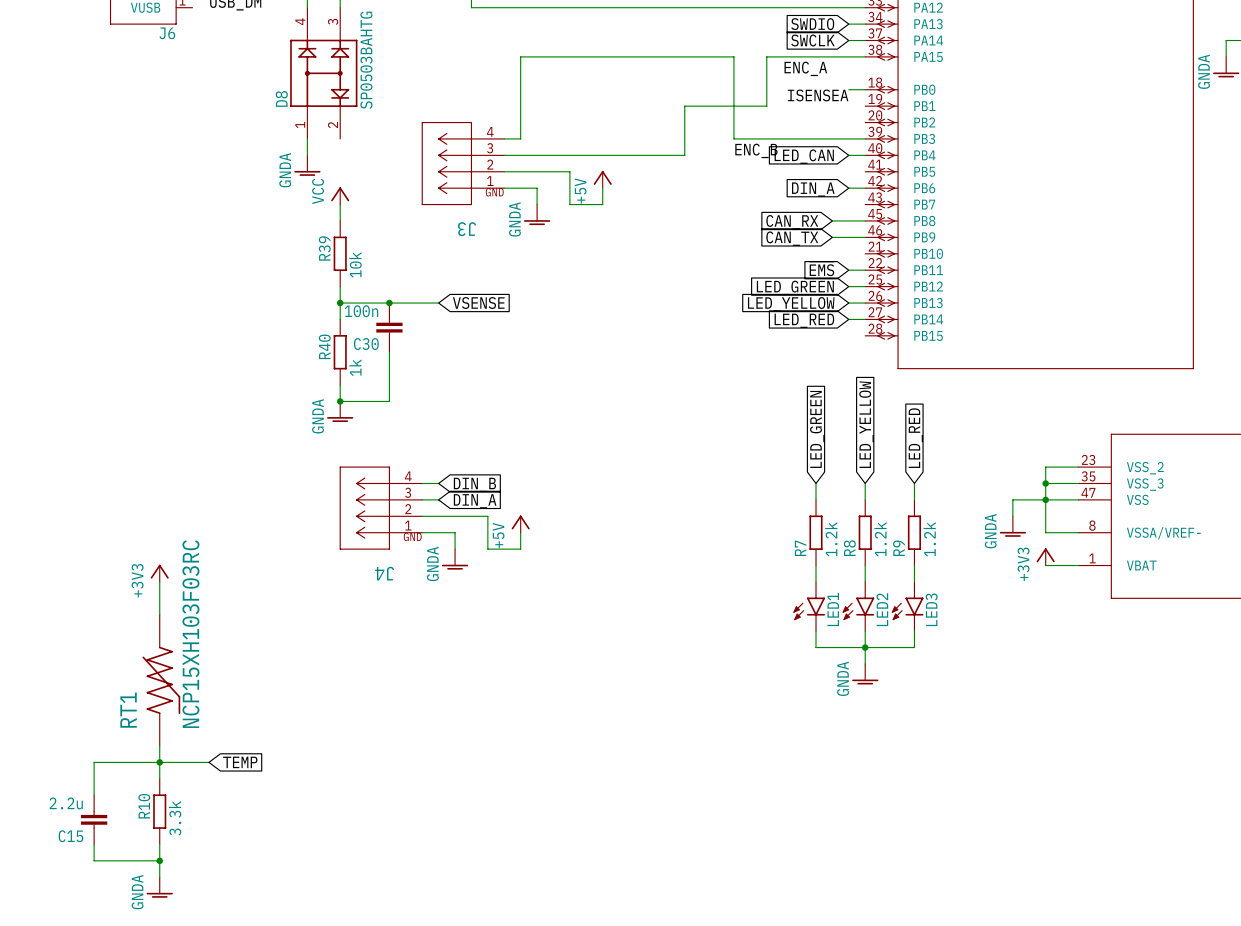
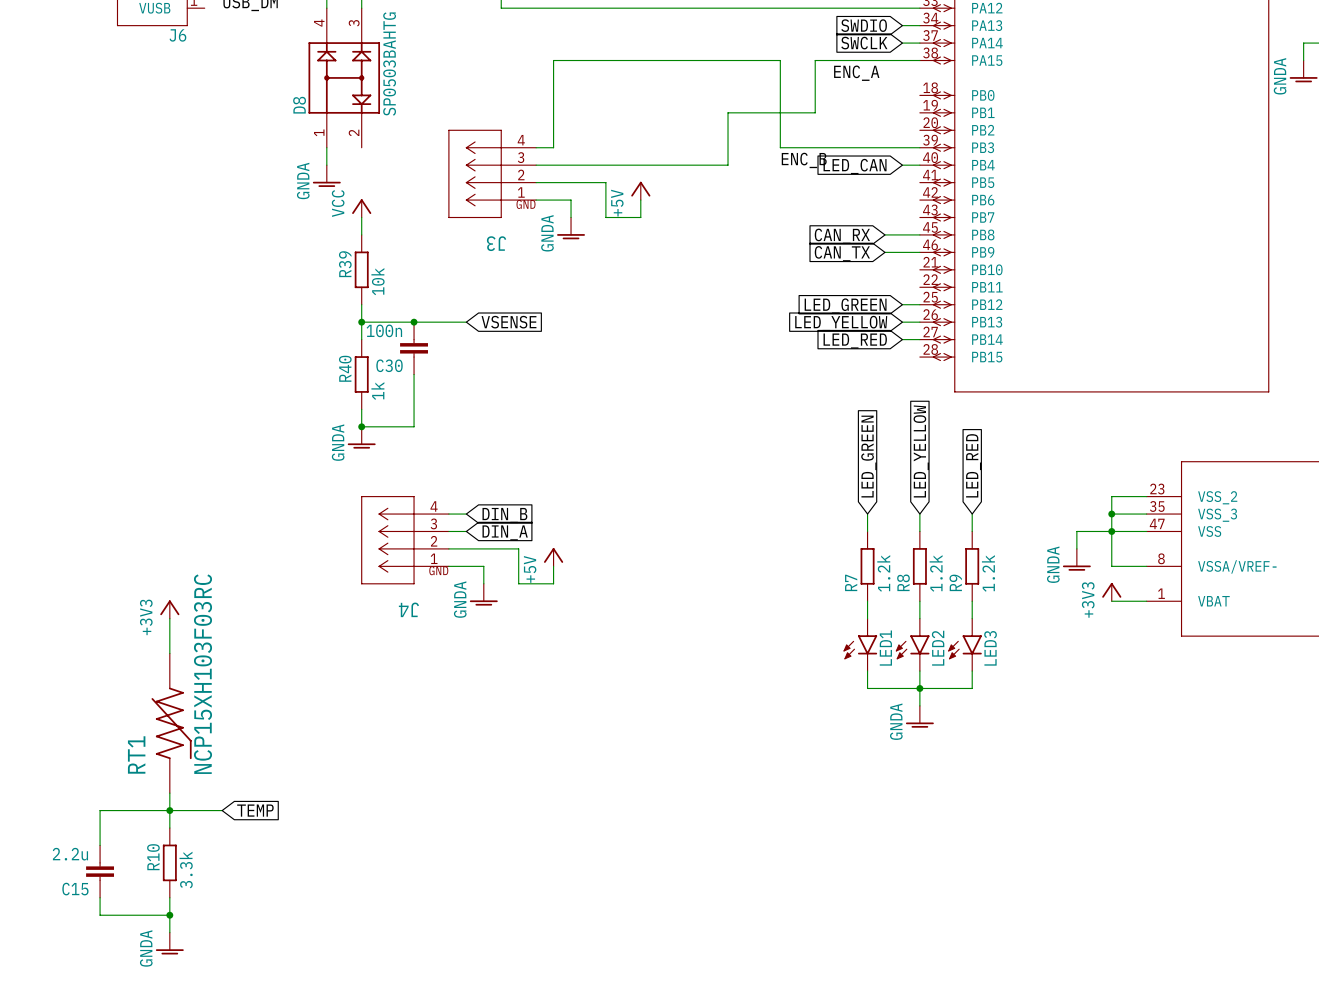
wire: (848, 89) (865, 89) -> none
label: ISENSEA (818, 95) -> none
wire: (848, 188) (865, 188) -> none
global label: DIN_A (813, 189) -> none
global label: ~{EMS} (821, 268) -> none
wire: (848, 270) (865, 270) -> none

